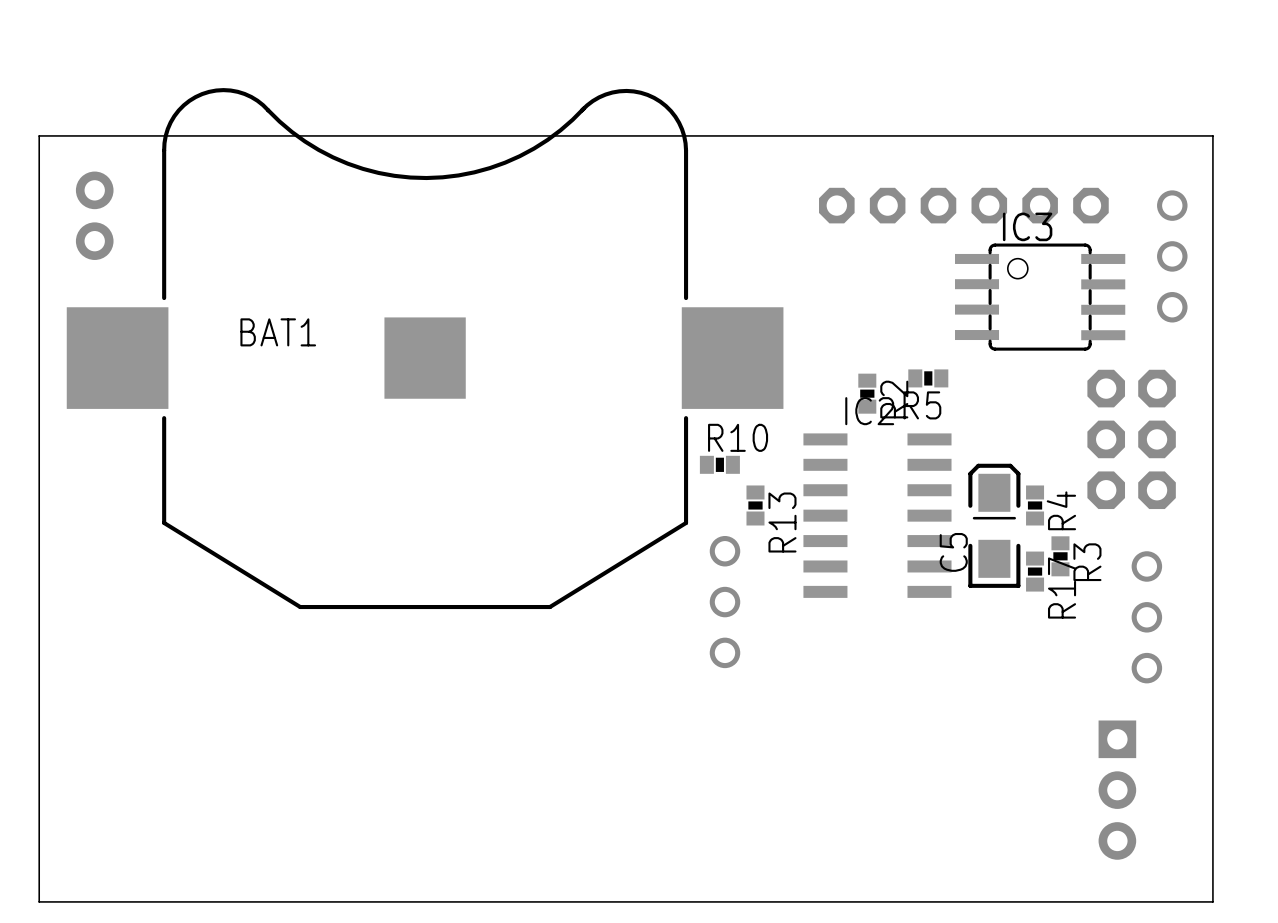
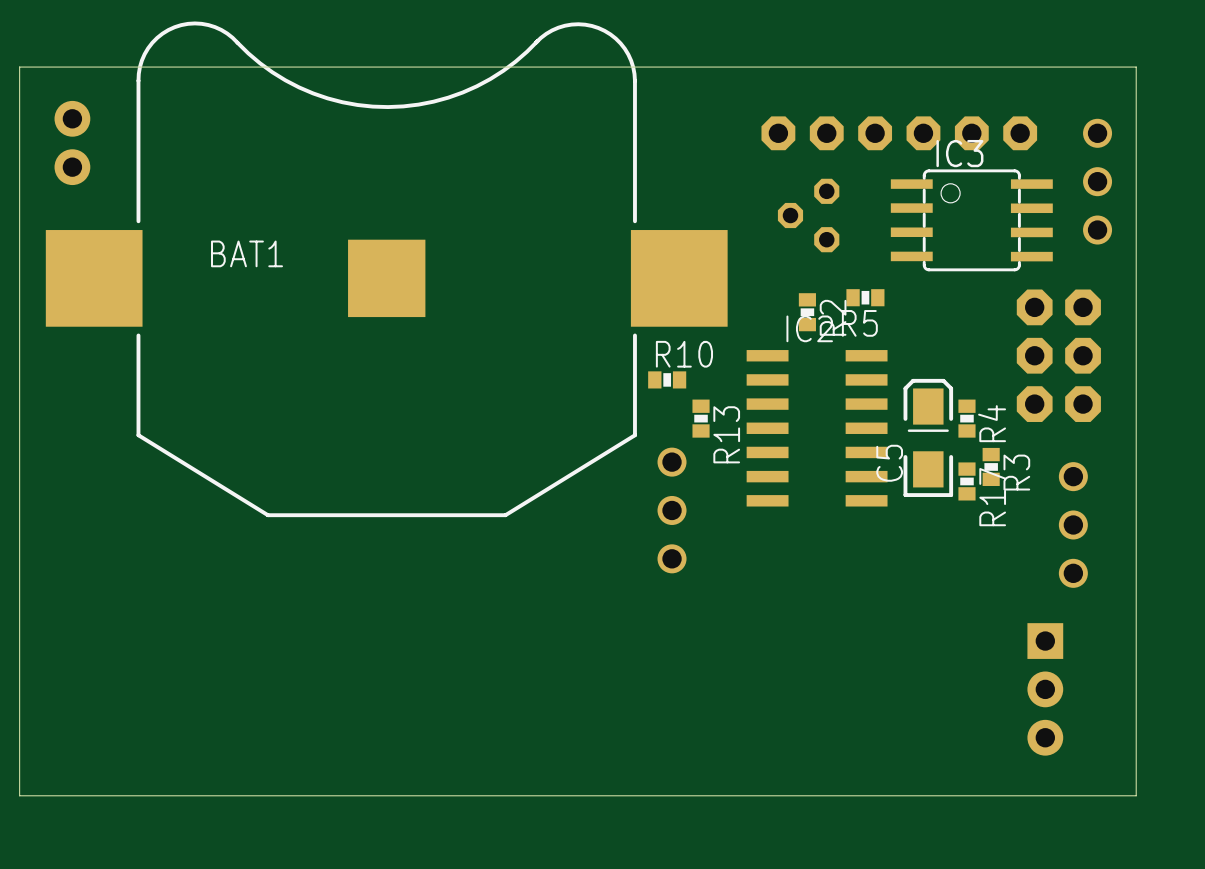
part: none -> (808, 215)

